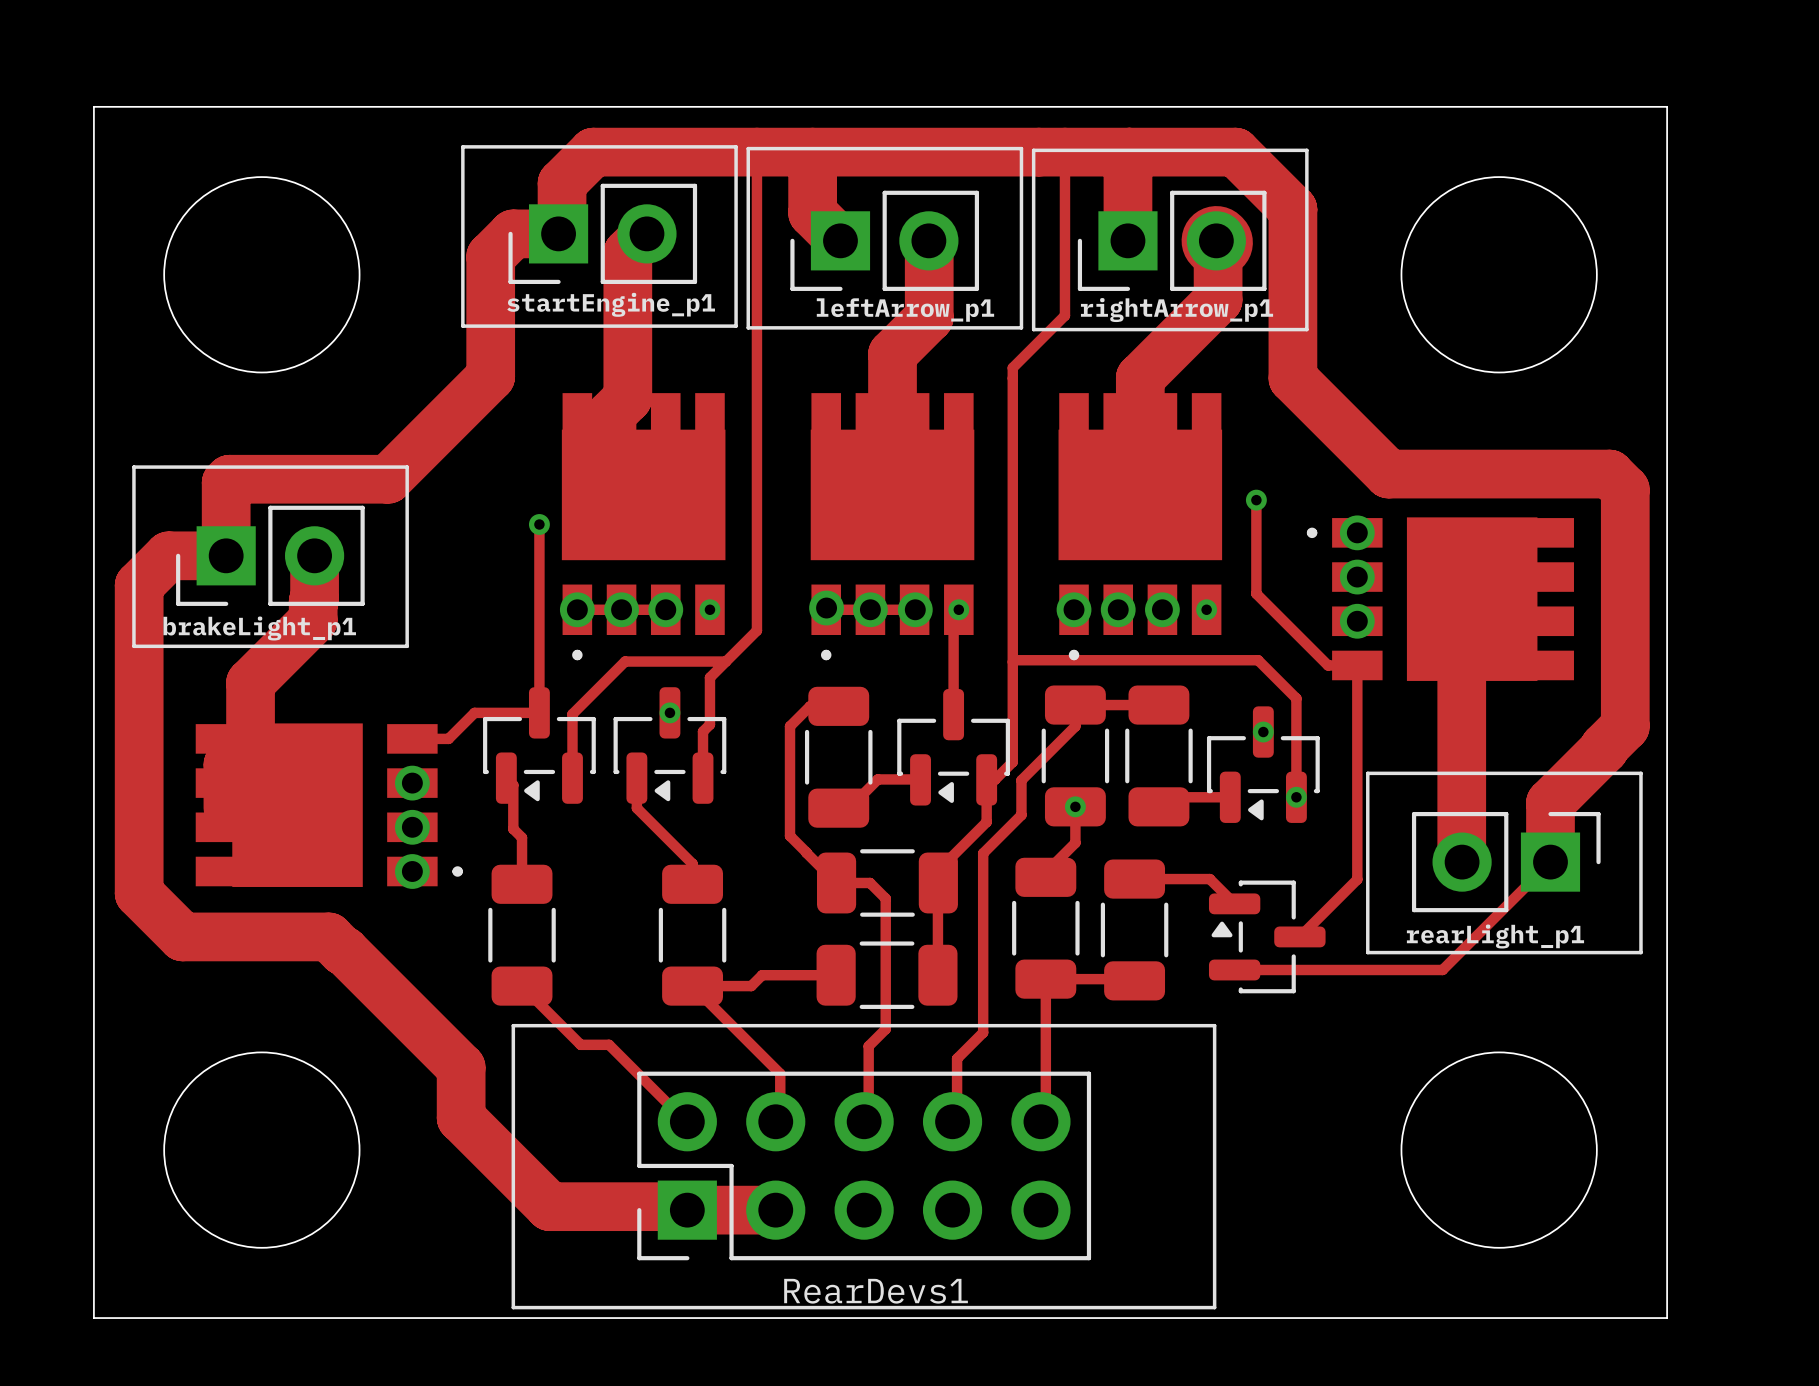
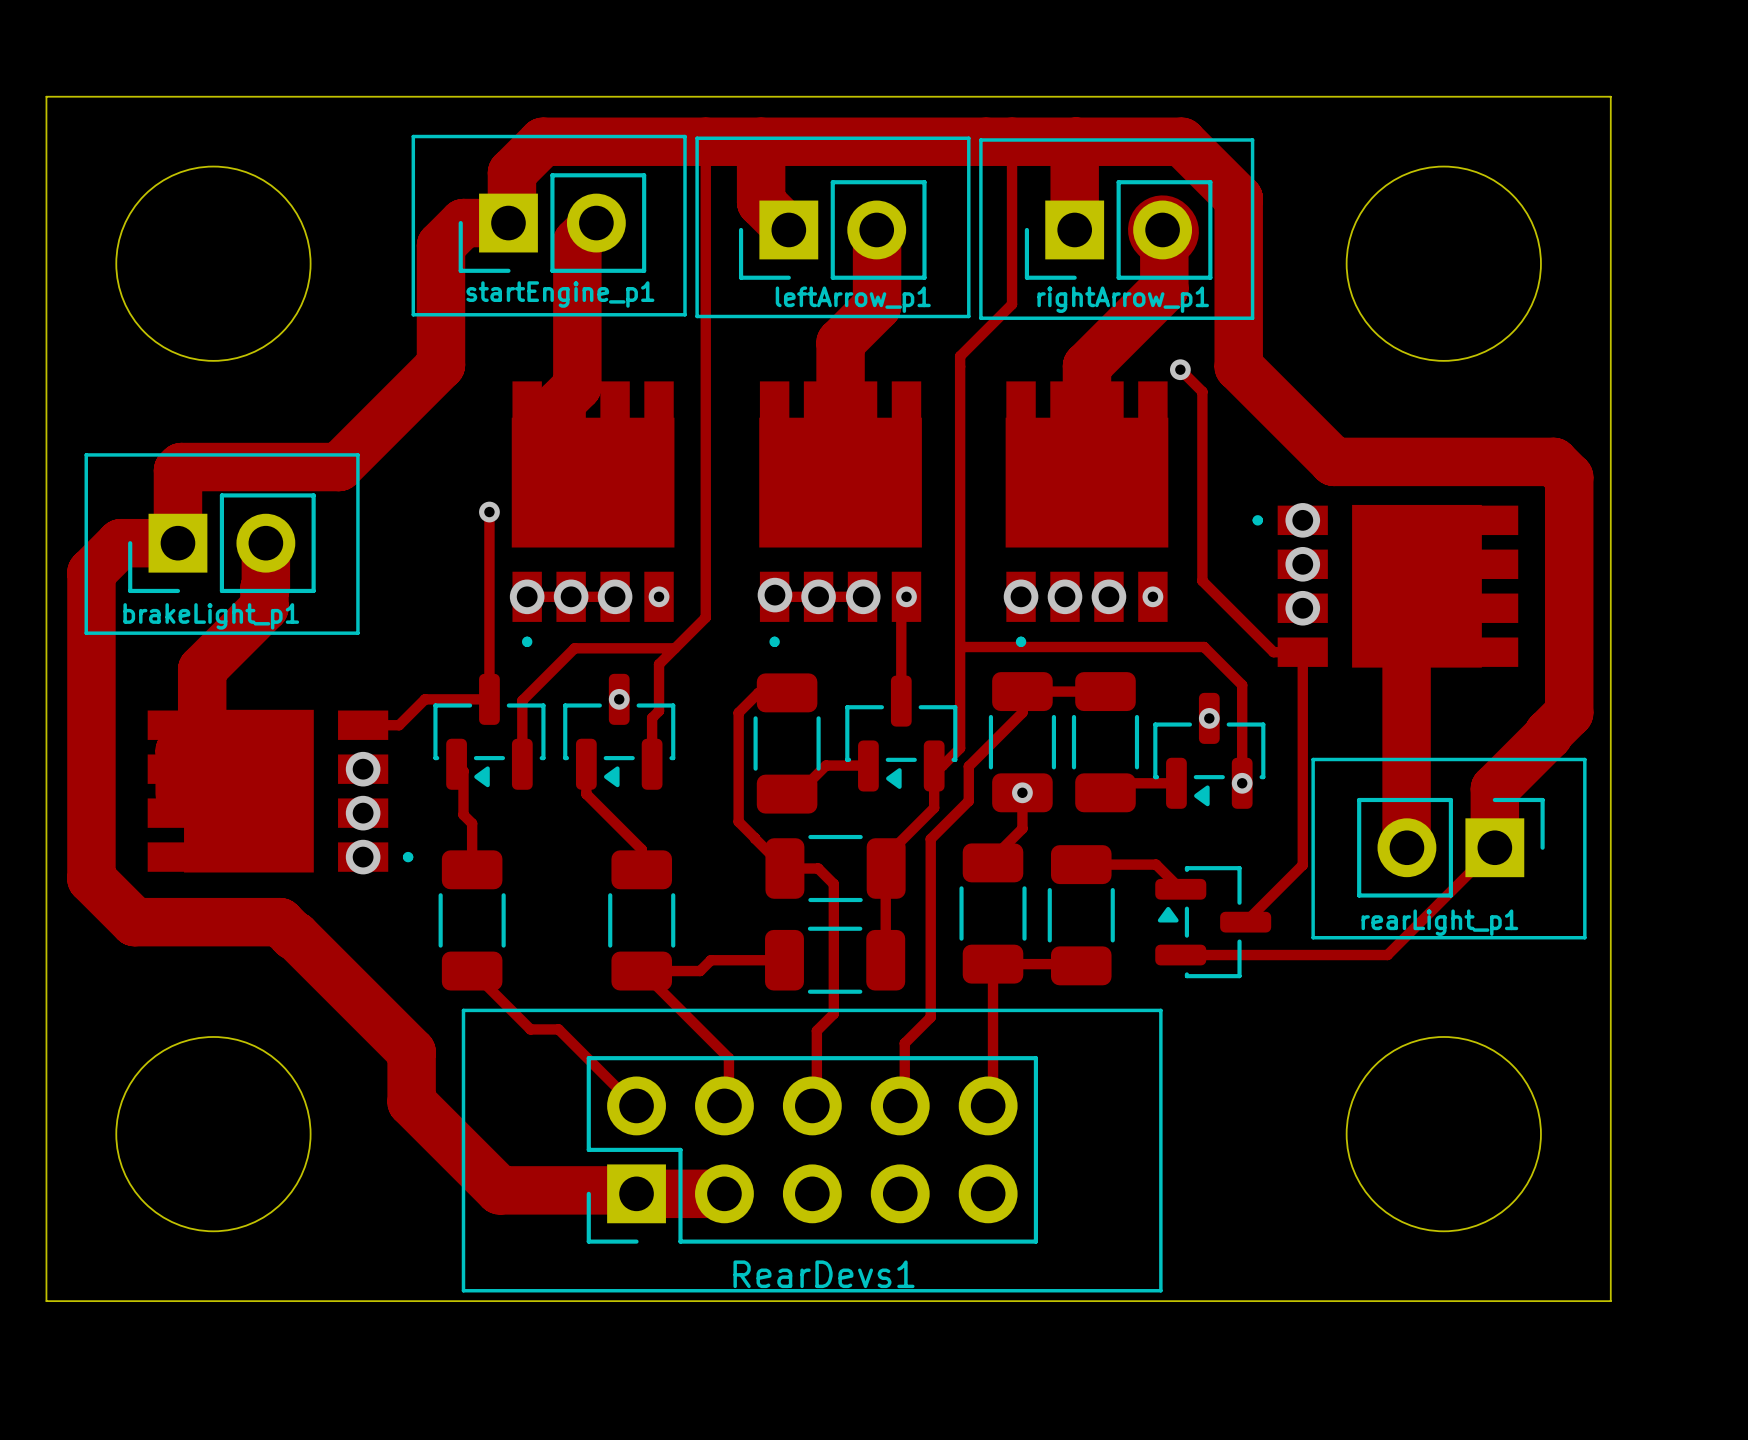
track: none -> (1180, 369) (1202, 391) (1202, 487)
via position: (1256, 500) -> (1180, 369)

